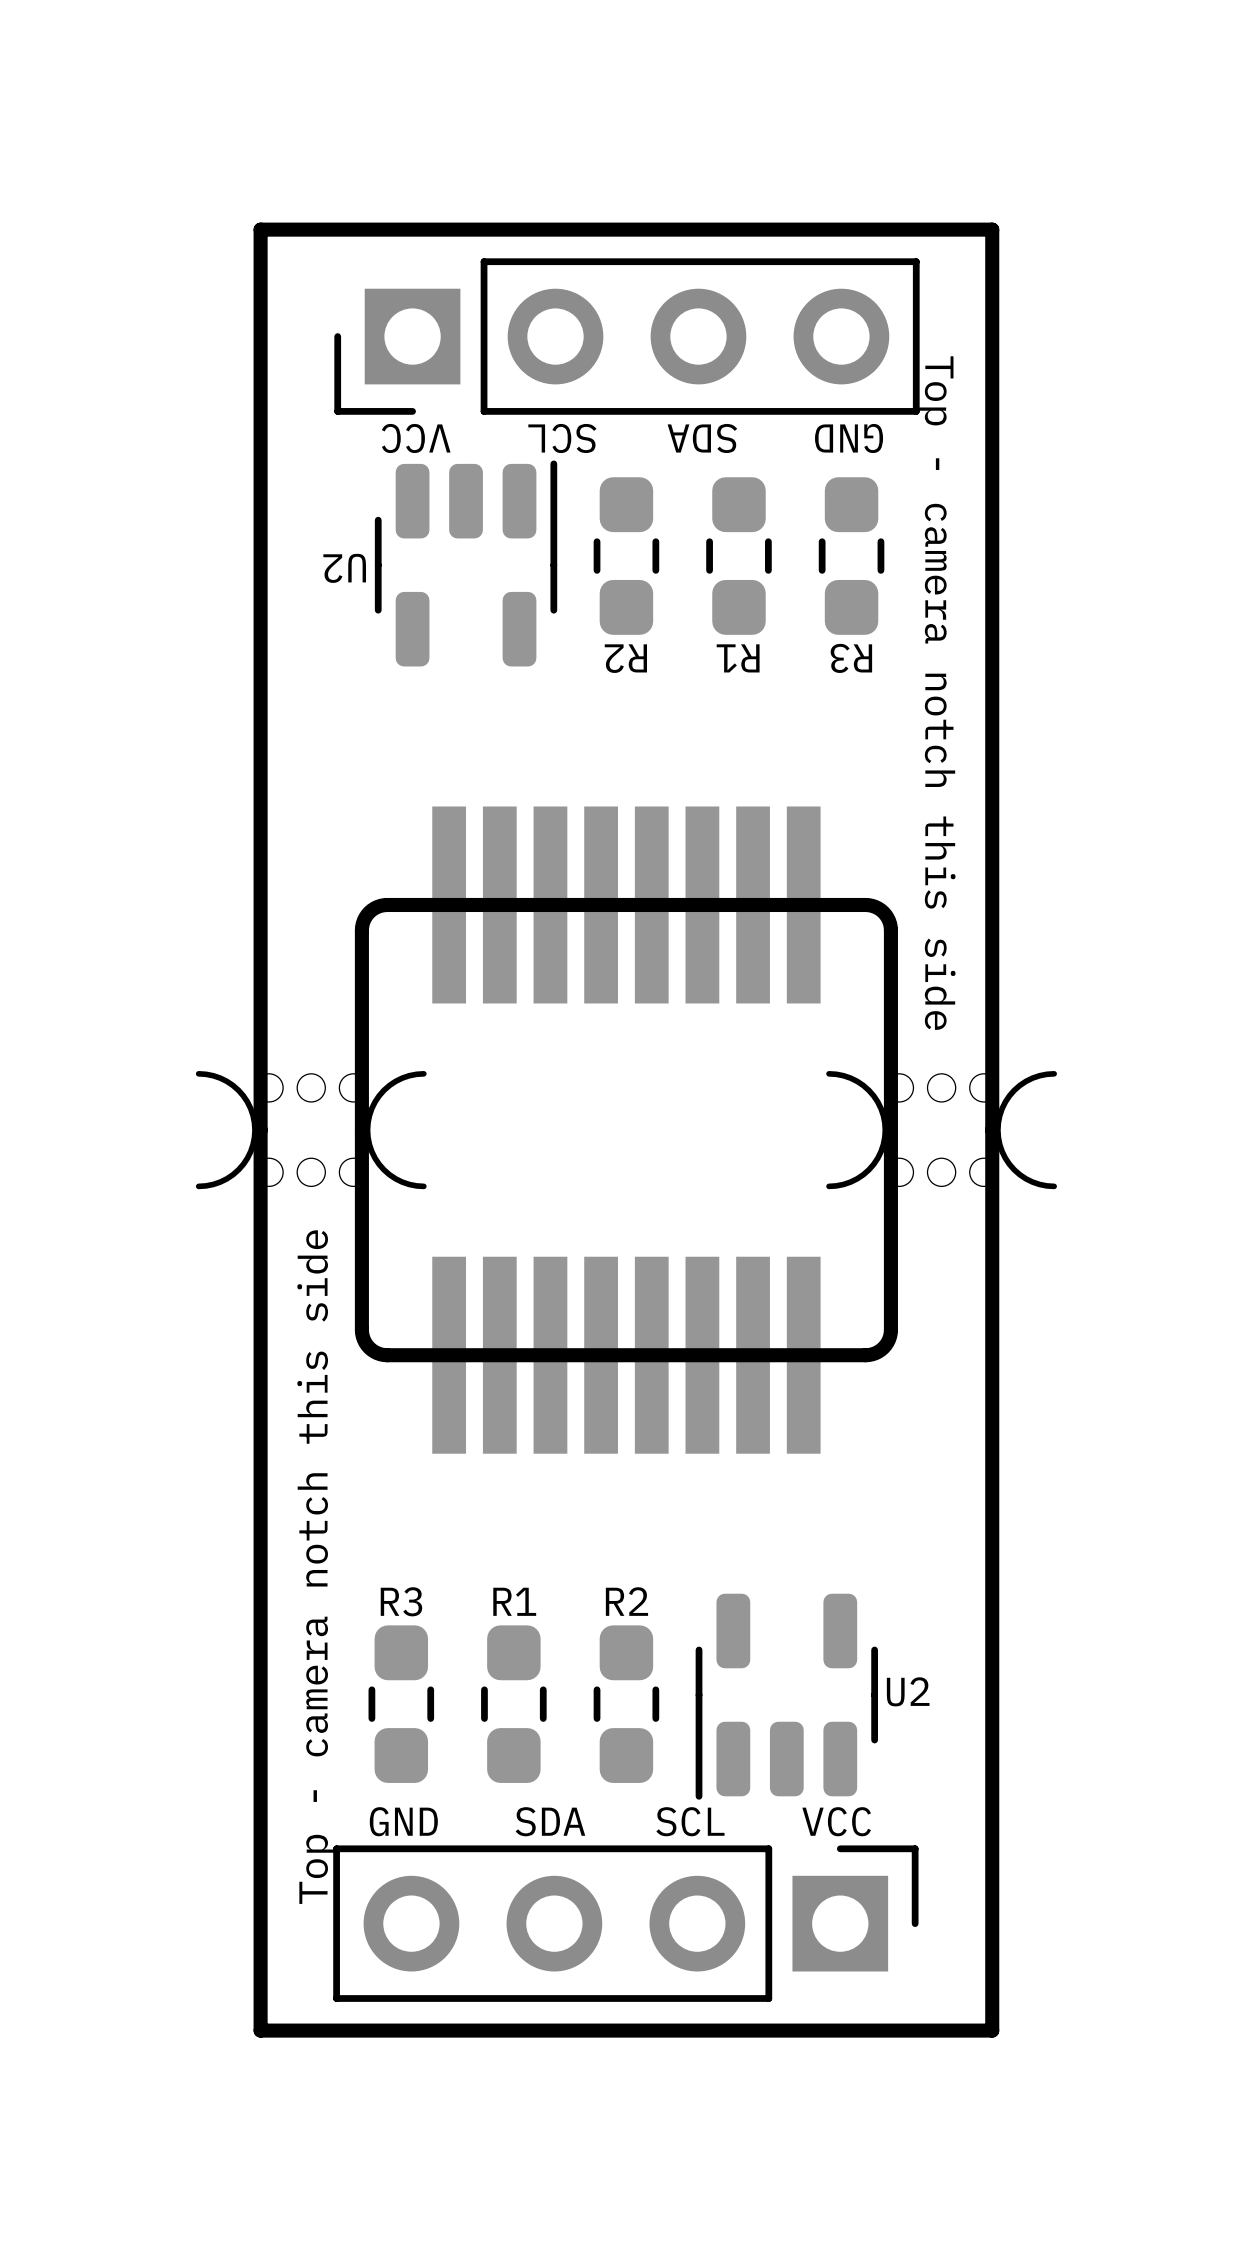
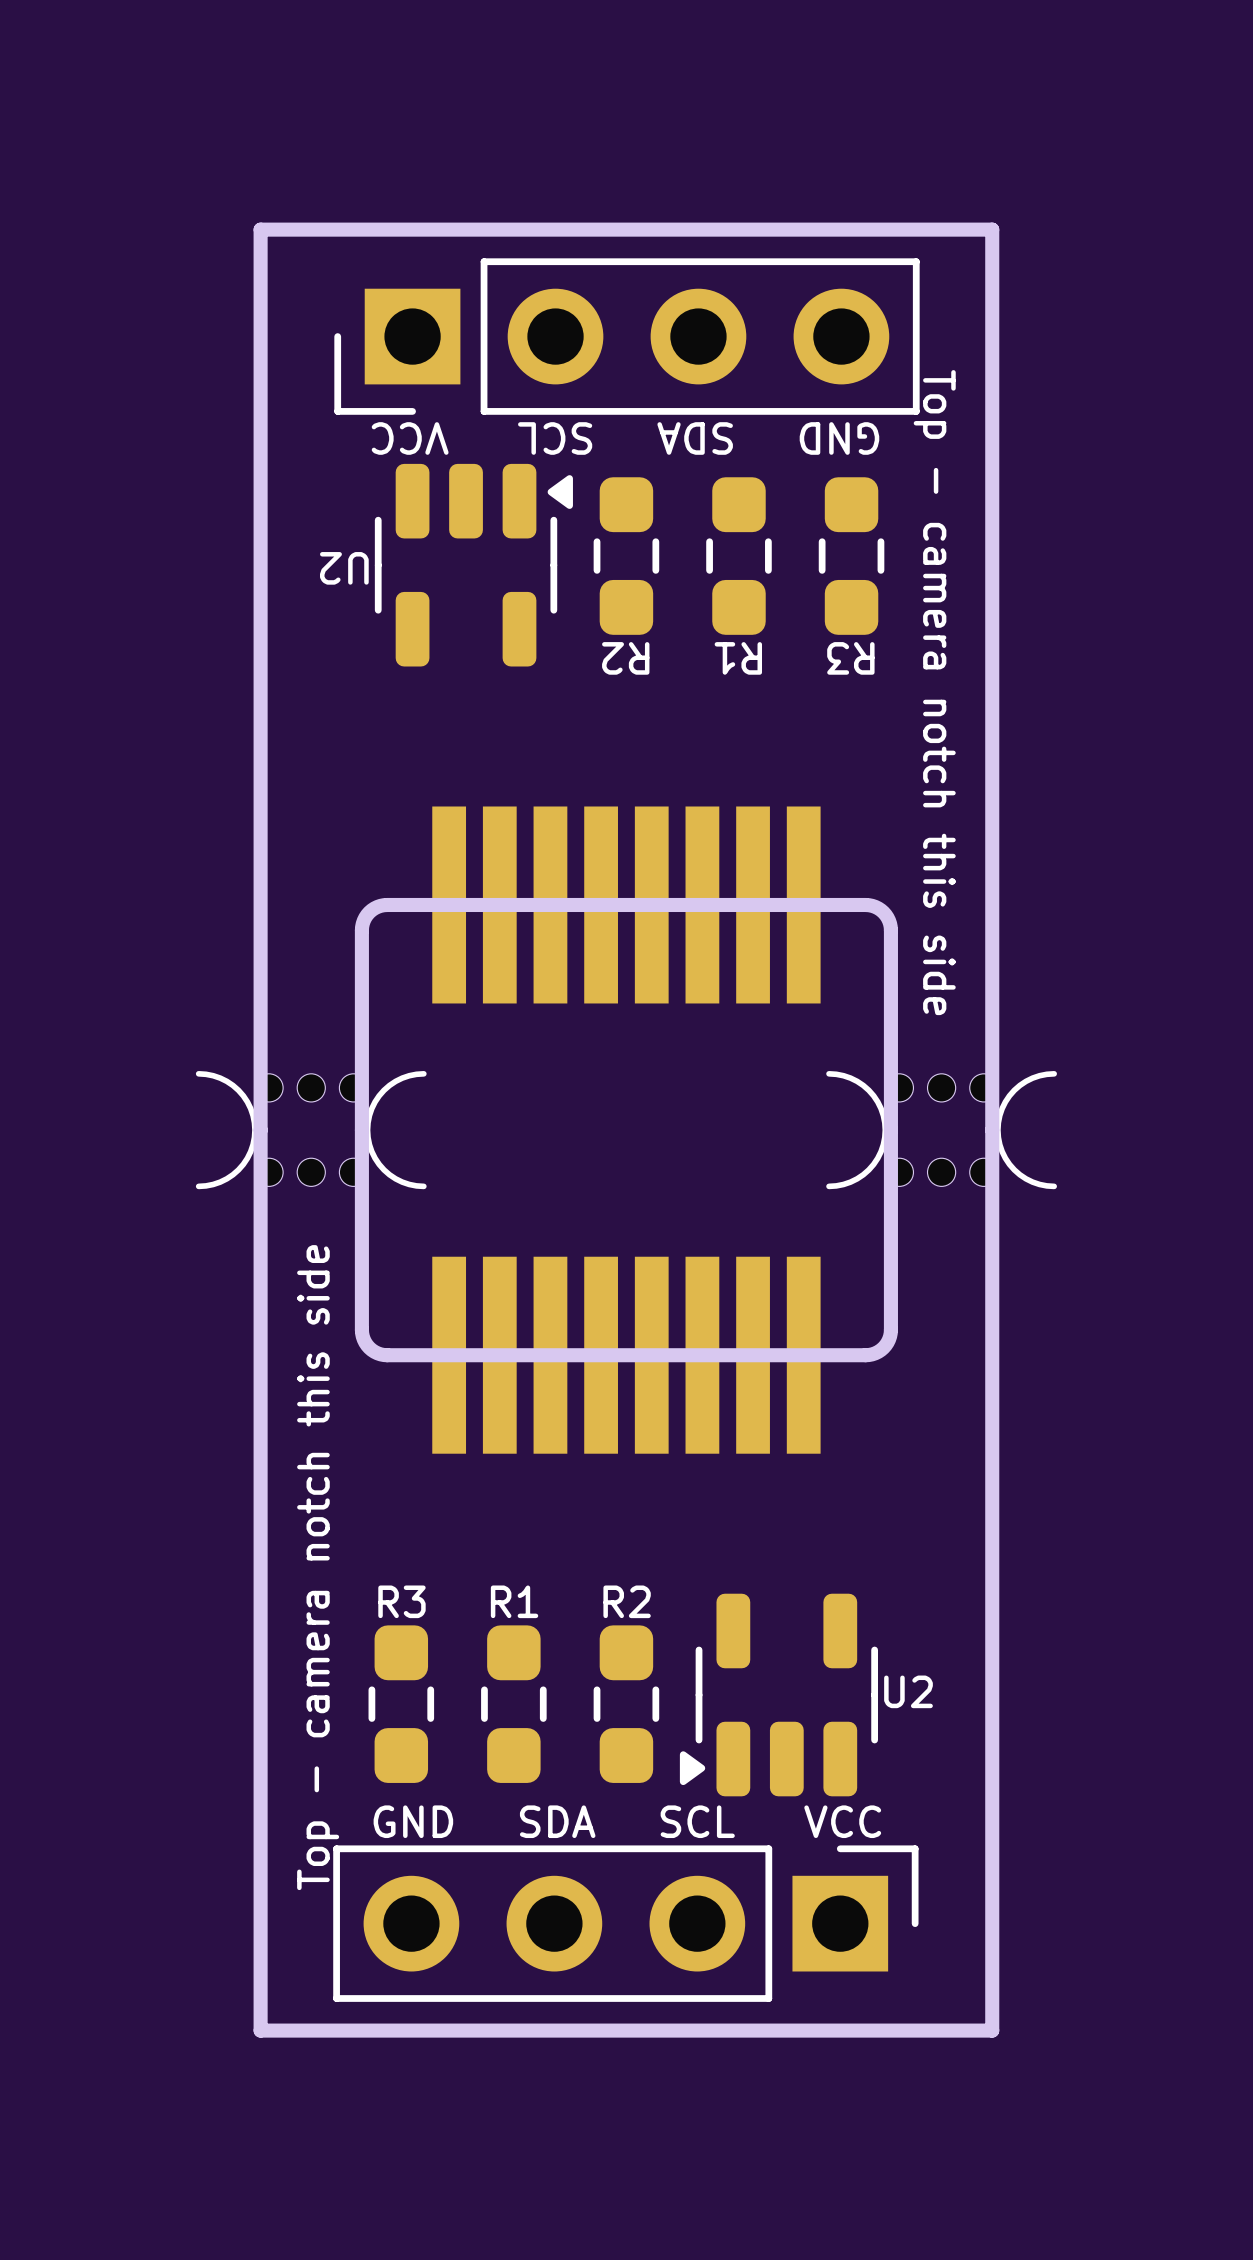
U2 footprint: [374, 460, 558, 667] -> [374, 463, 573, 667]
U2 footprint: [695, 1593, 879, 1800] -> [679, 1593, 879, 1797]

